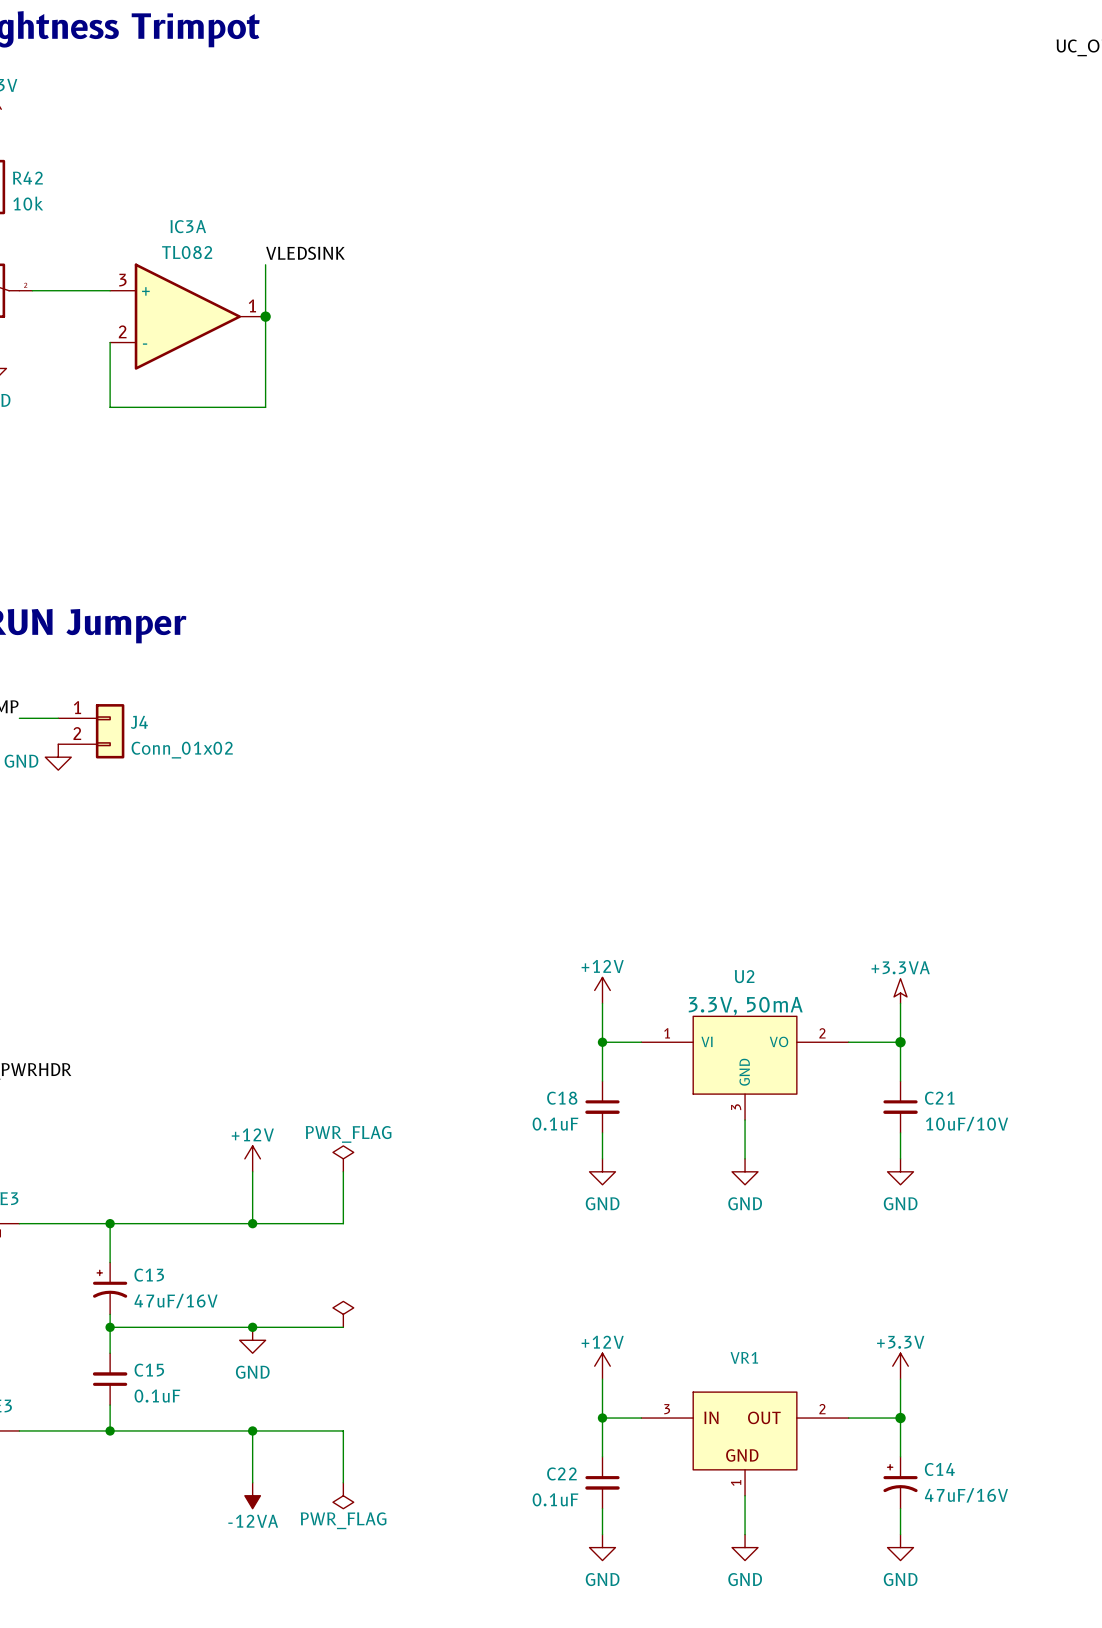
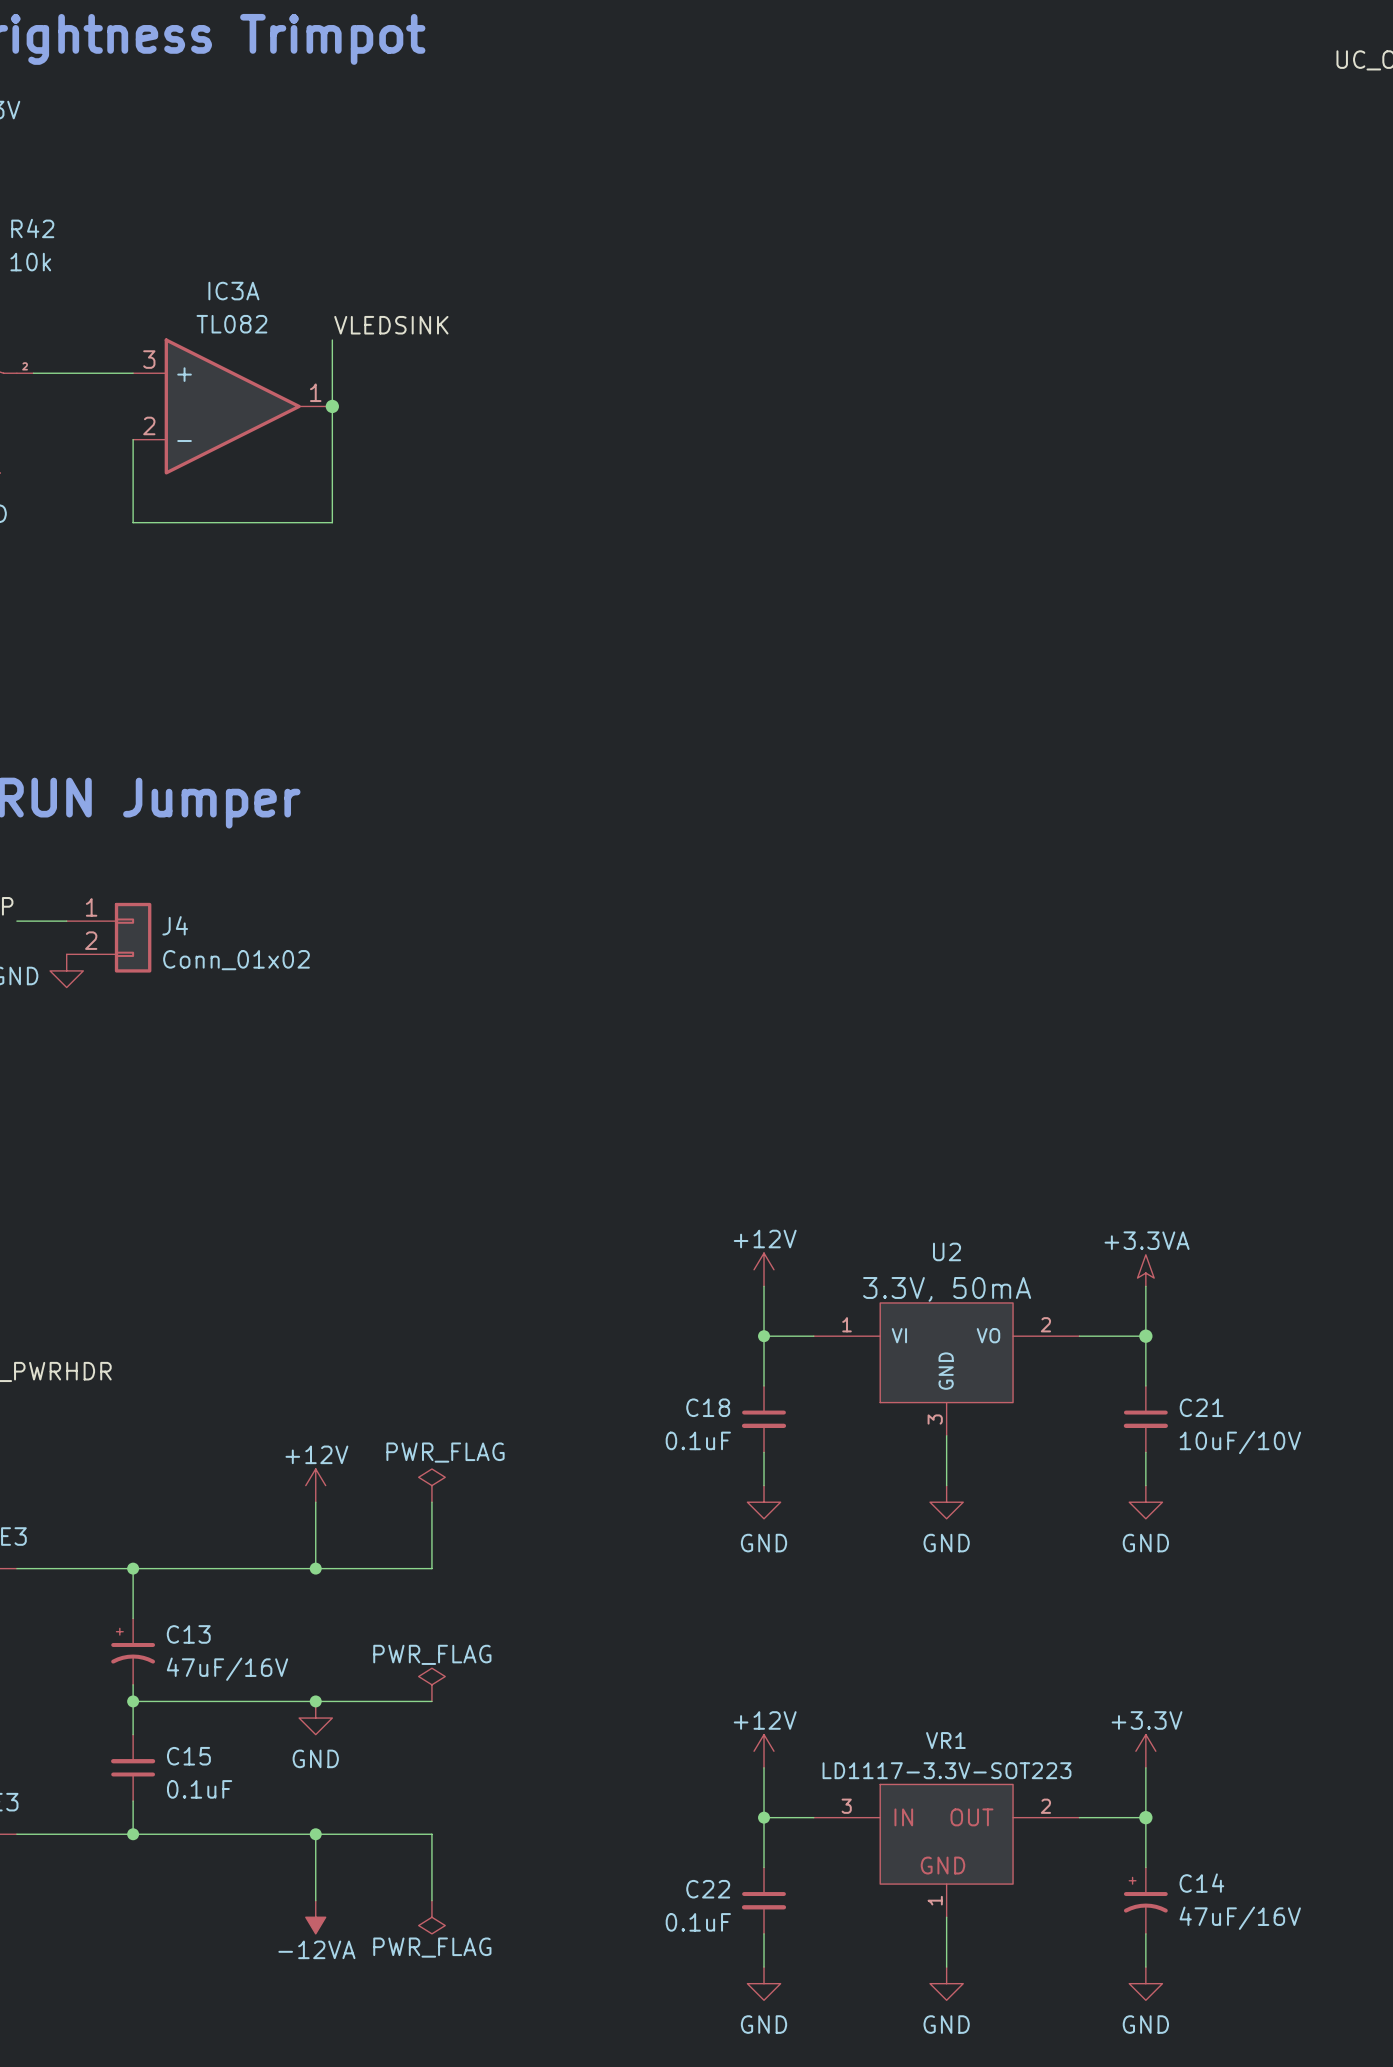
power symbol text: none -> PWR_FLAG (432, 1654)
VR1 value: none -> LD1117-3.3V-SOT223 (946, 1770)

